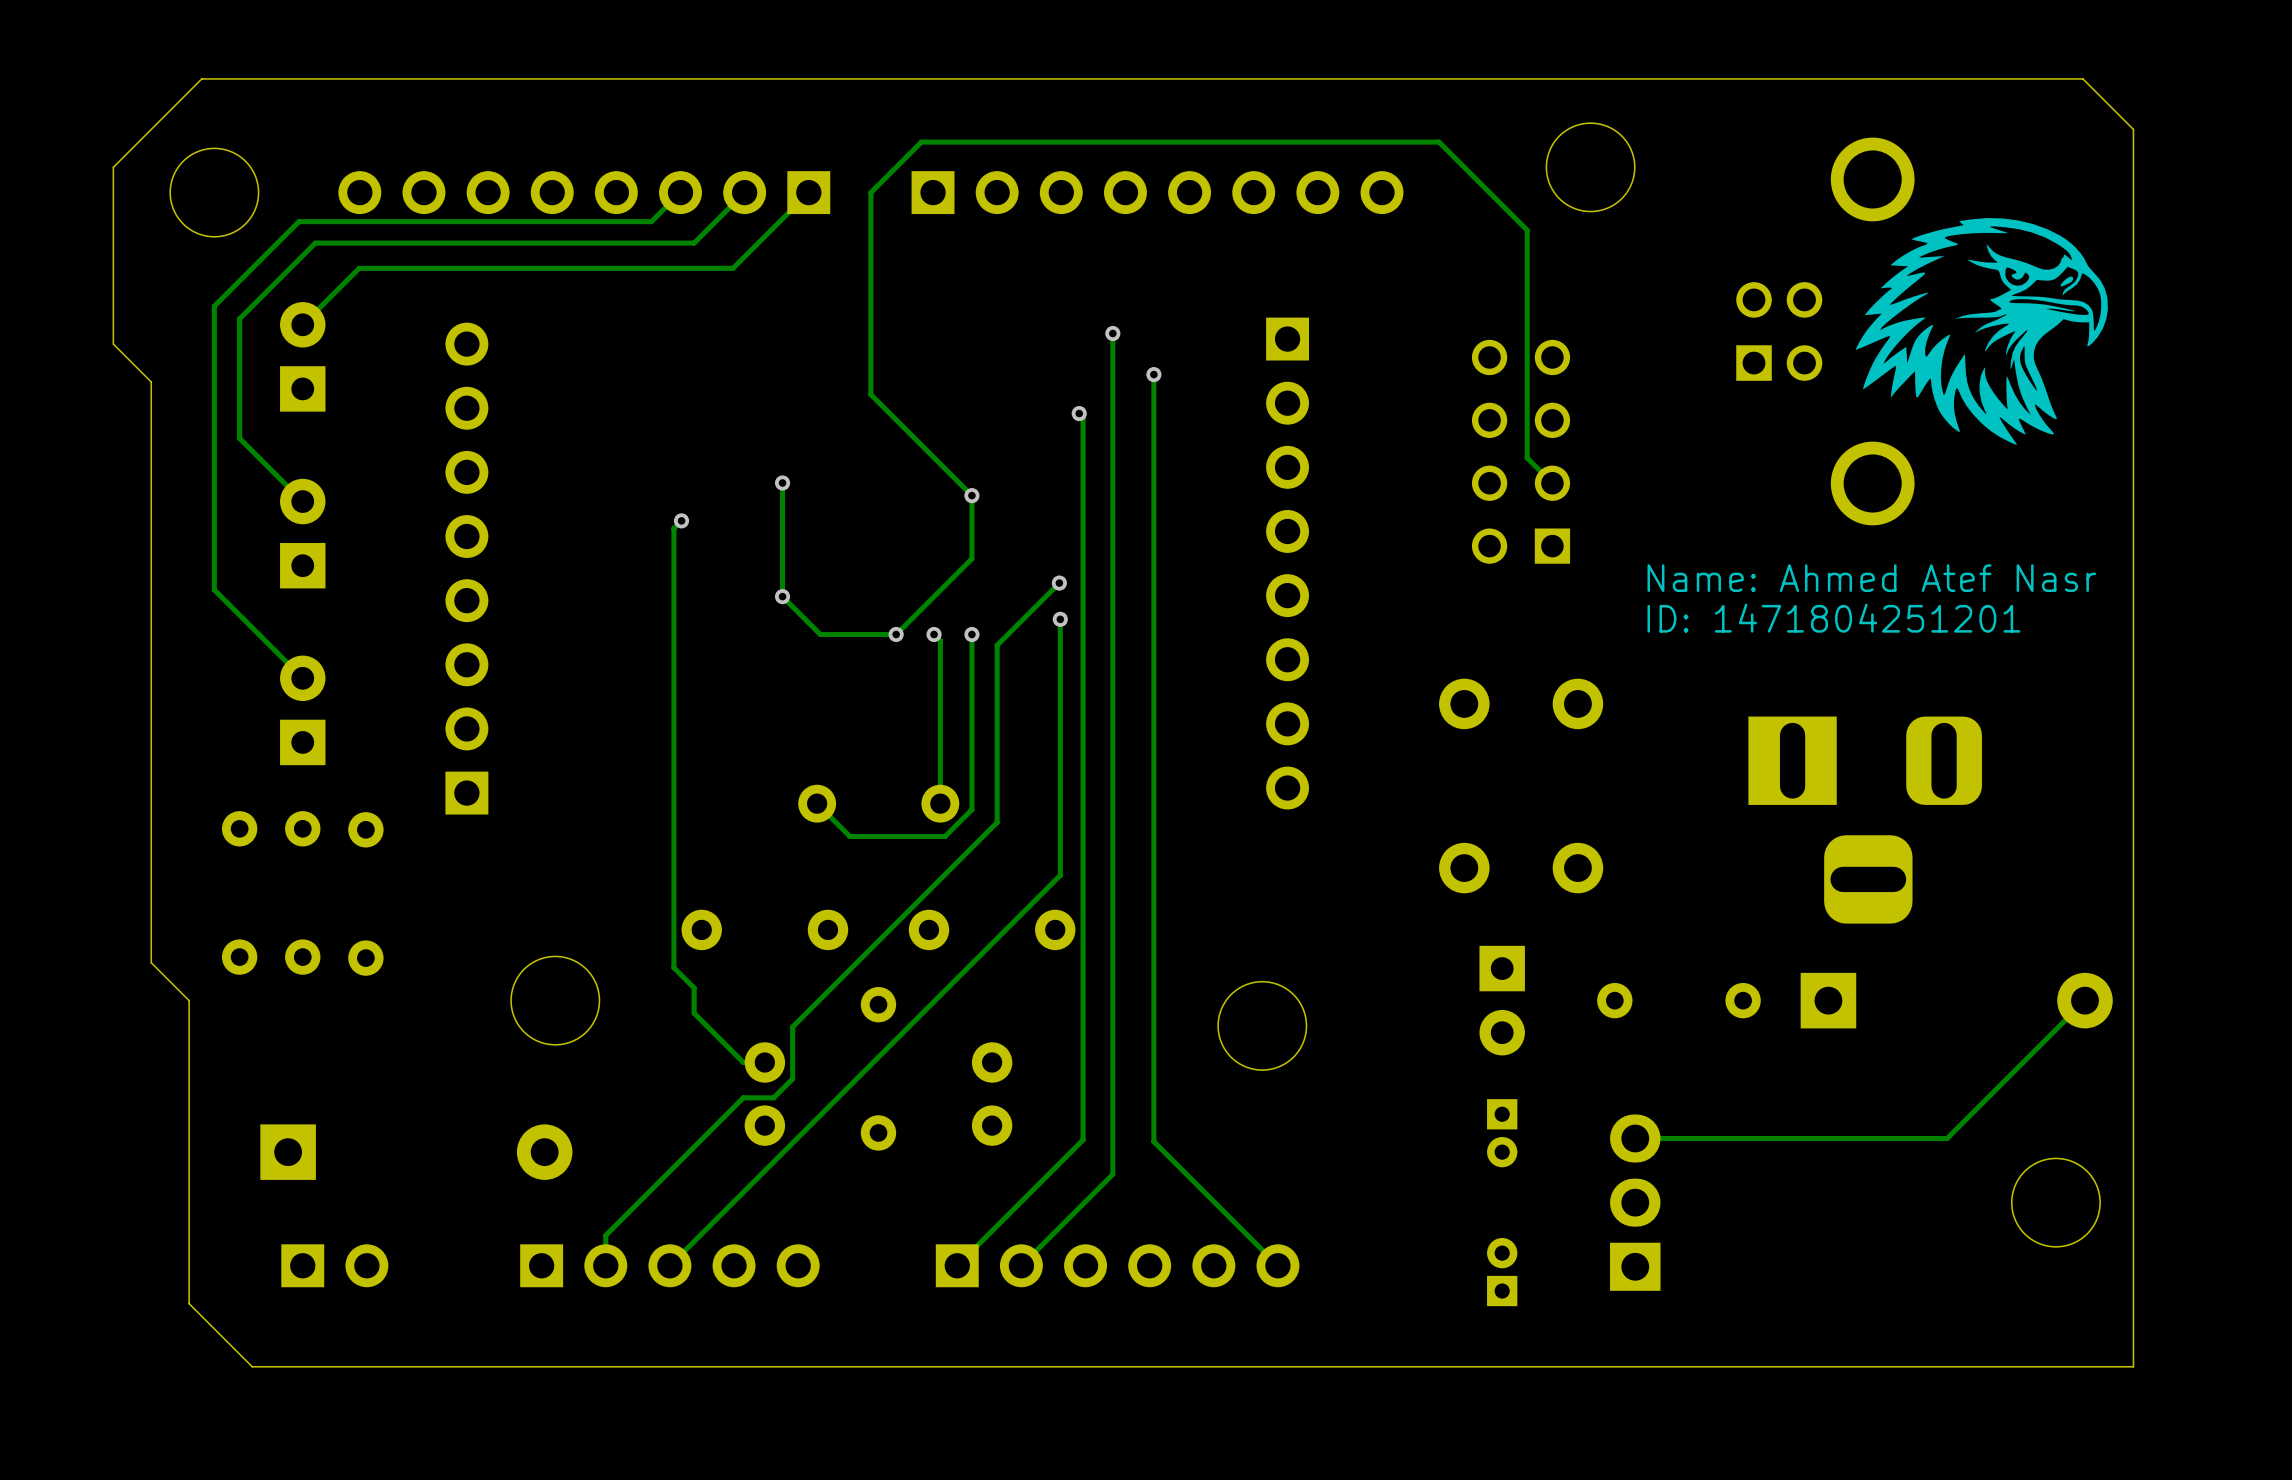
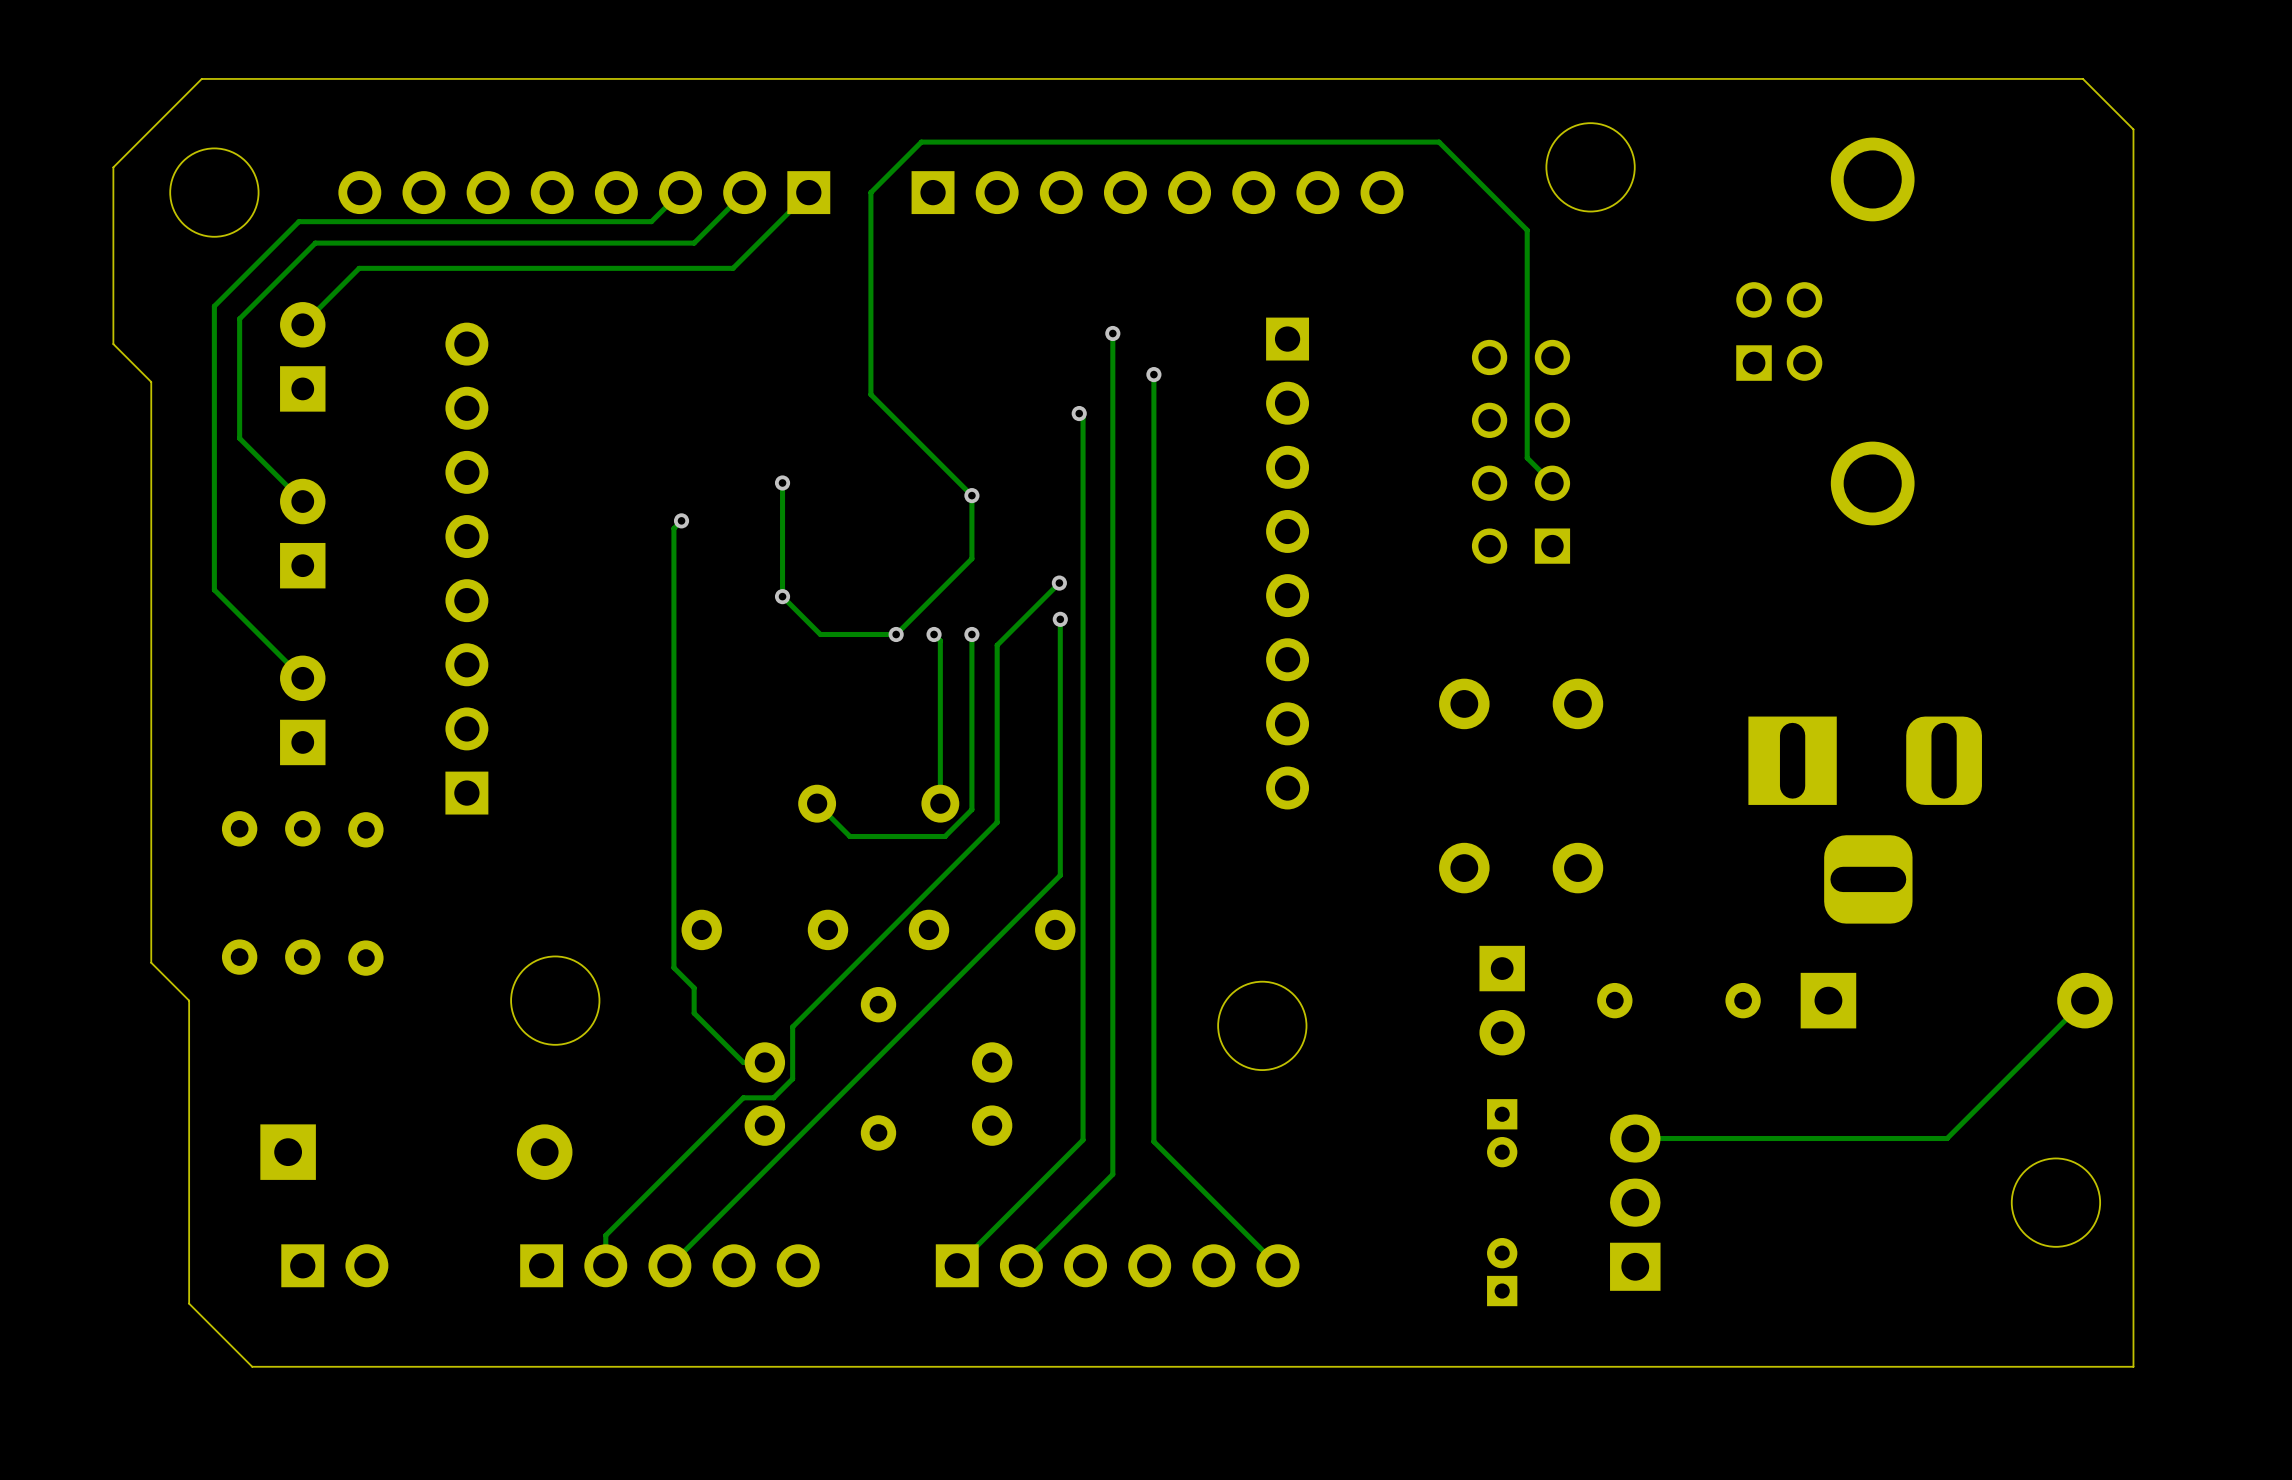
drawing: [1855, 218, 2108, 446] -> none
text: Name: Ahmed Atef Nasr (1871, 578) -> none
text: ID: 1471804251201 (1833, 618) -> none

